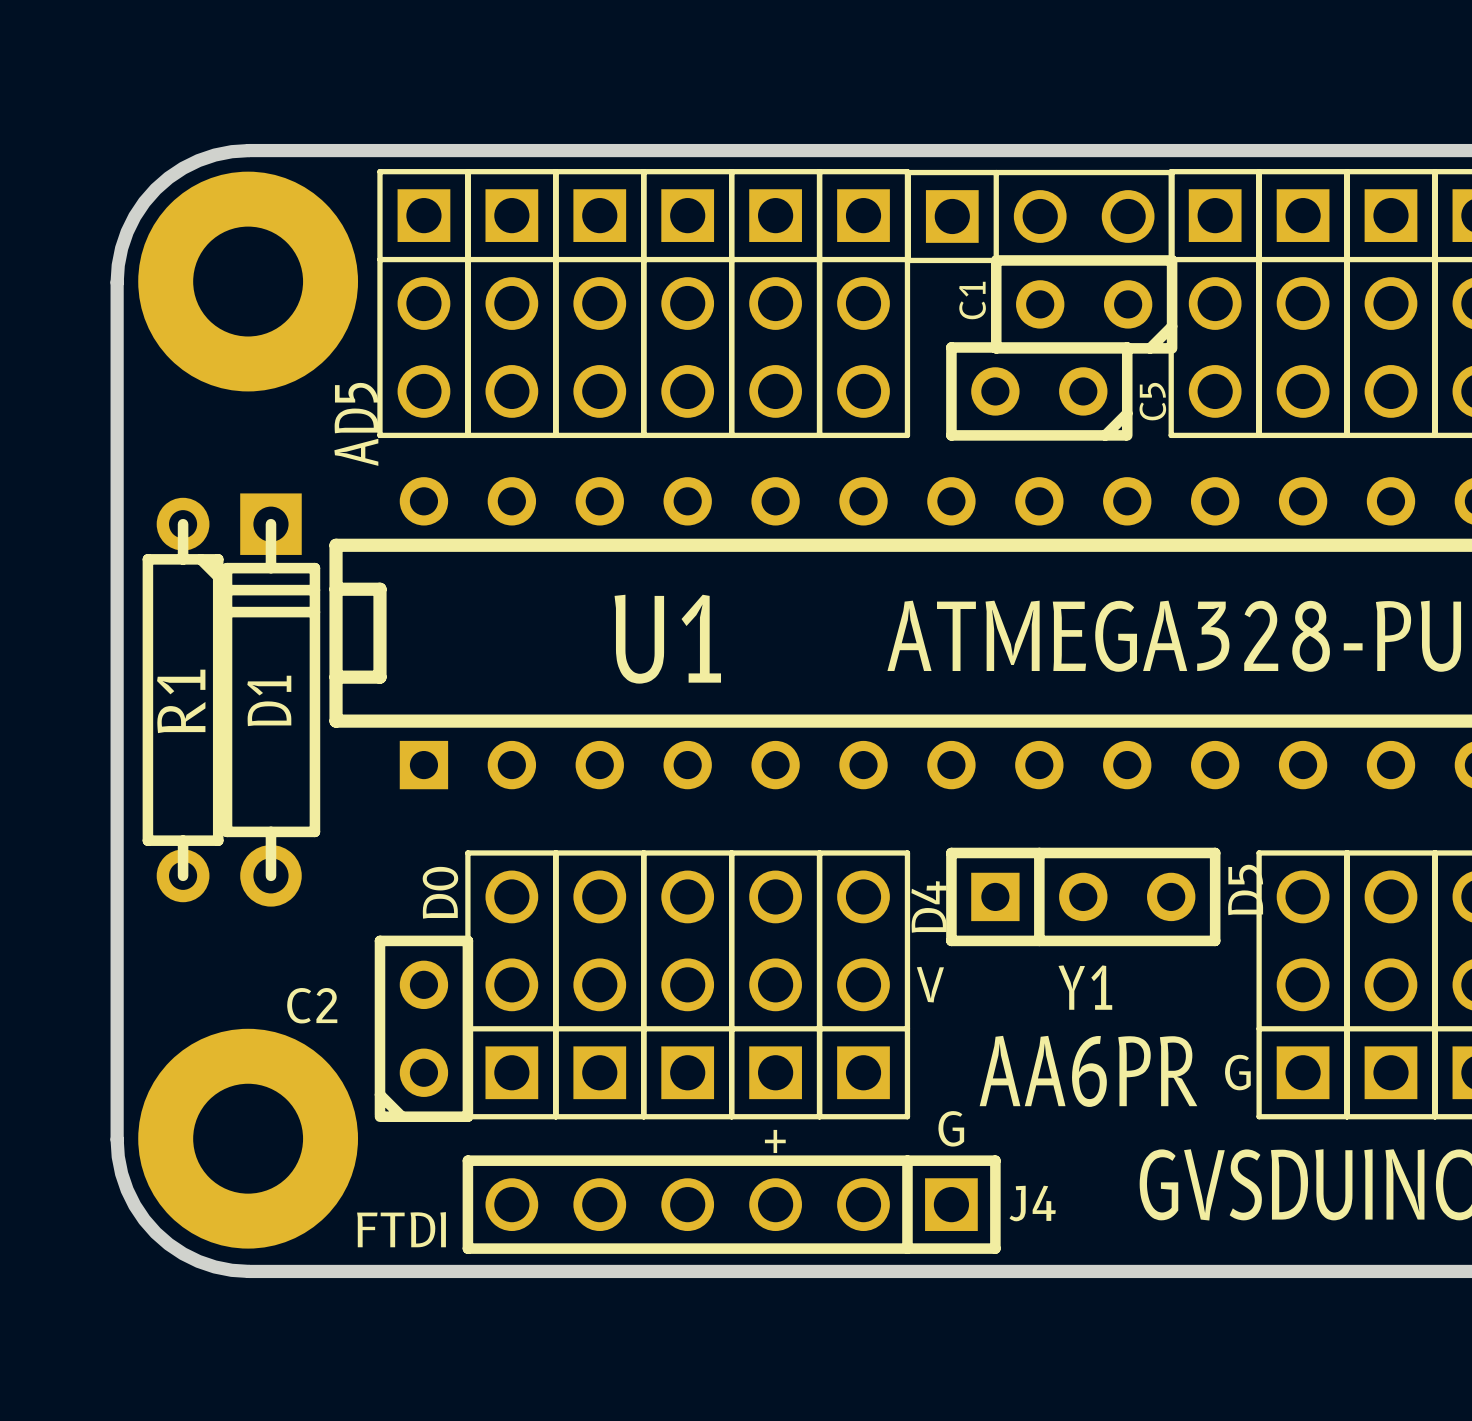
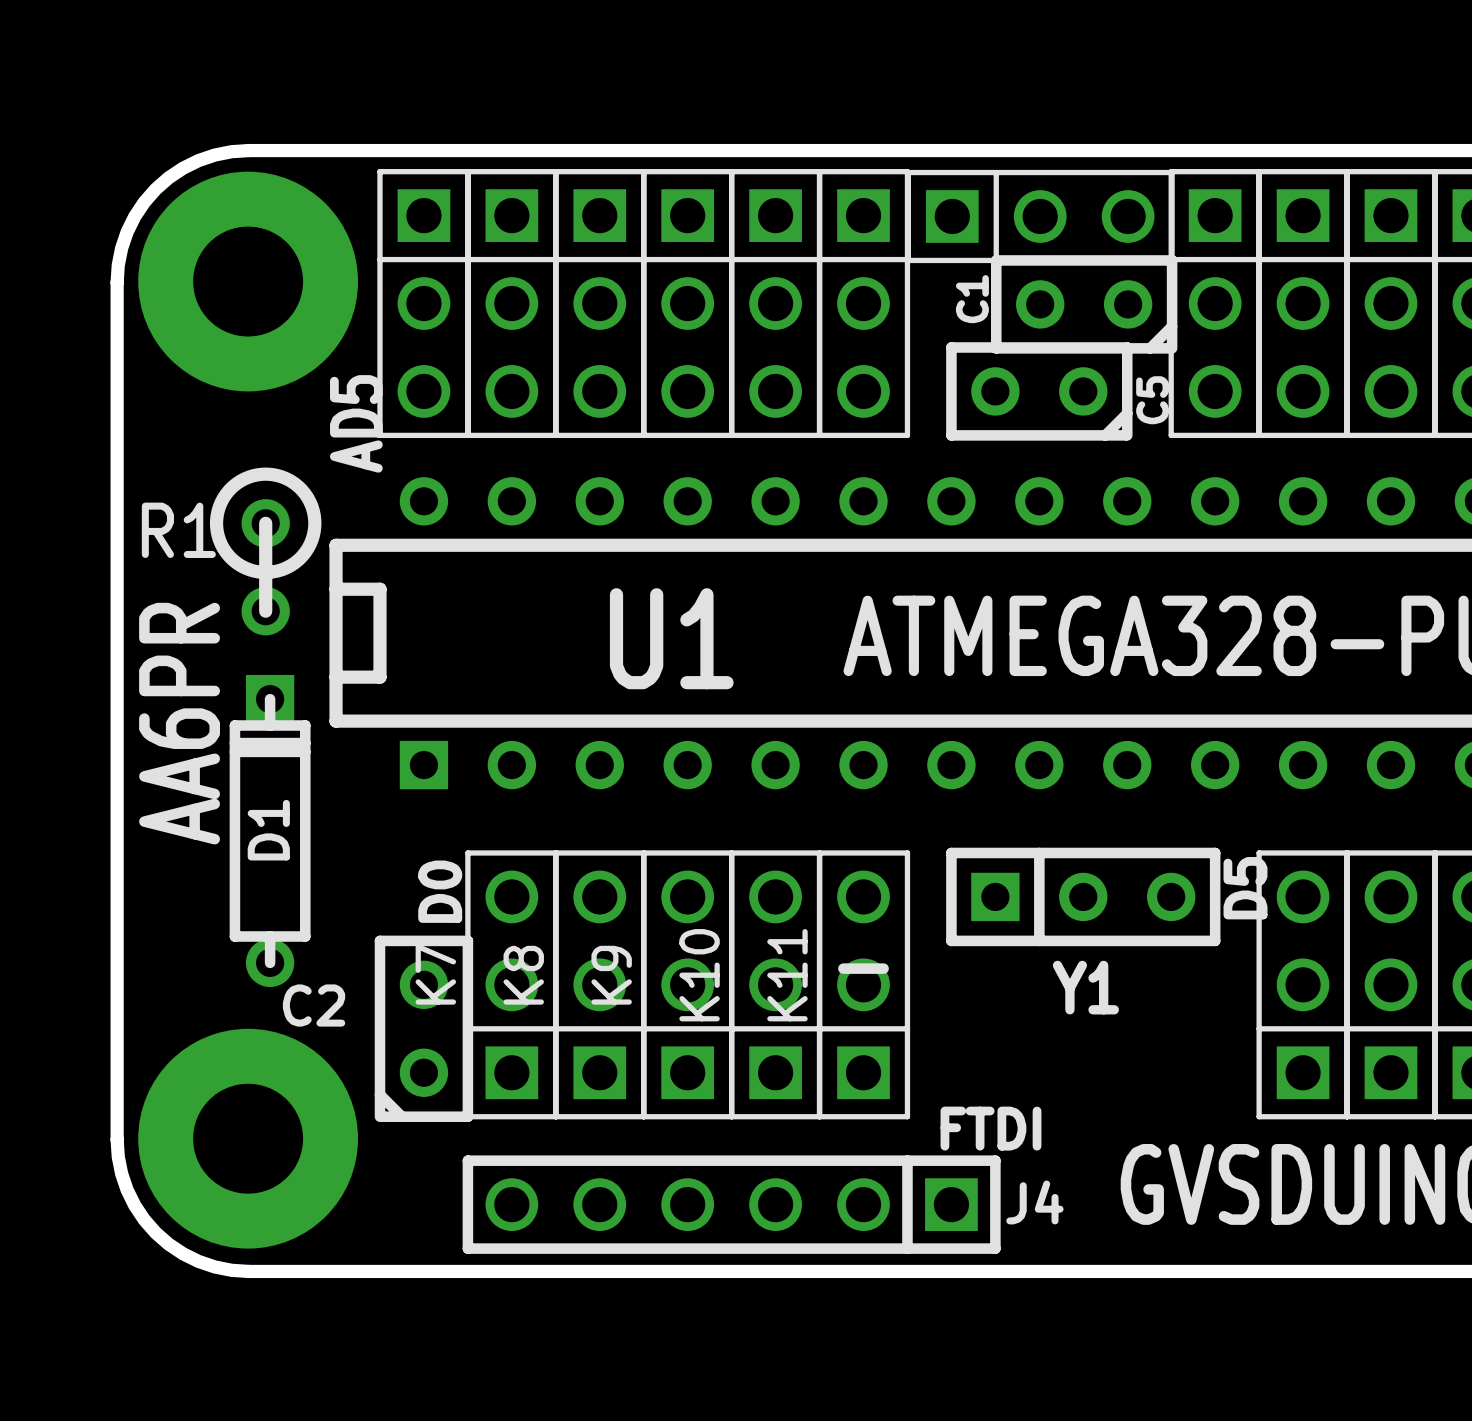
D1 footprint: [221, 493, 321, 907] -> [229, 674, 311, 988]
R1 footprint: [142, 497, 224, 903] -> [209, 467, 322, 636]
R1 name position: R1 (181, 701) -> R1 (178, 530)
text: none -> AA6PR (179, 723)
text: D4 (929, 906) -> none
text: none -> - (863, 968)
K7 name: none -> K7 (435, 974)
K8 name: none -> K8 (523, 975)
K9 name: none -> K9 (611, 975)
K10 name: none -> K10 (699, 975)
K11 name: none -> K11 (787, 975)
text: V (930, 984) -> none
text: AA6PR (1088, 1071) -> none
text: G (1237, 1072) -> none
text: G (951, 1128) -> none
text: + (775, 1141) -> none
text position: FTDI (401, 1229) -> FTDI (990, 1128)

